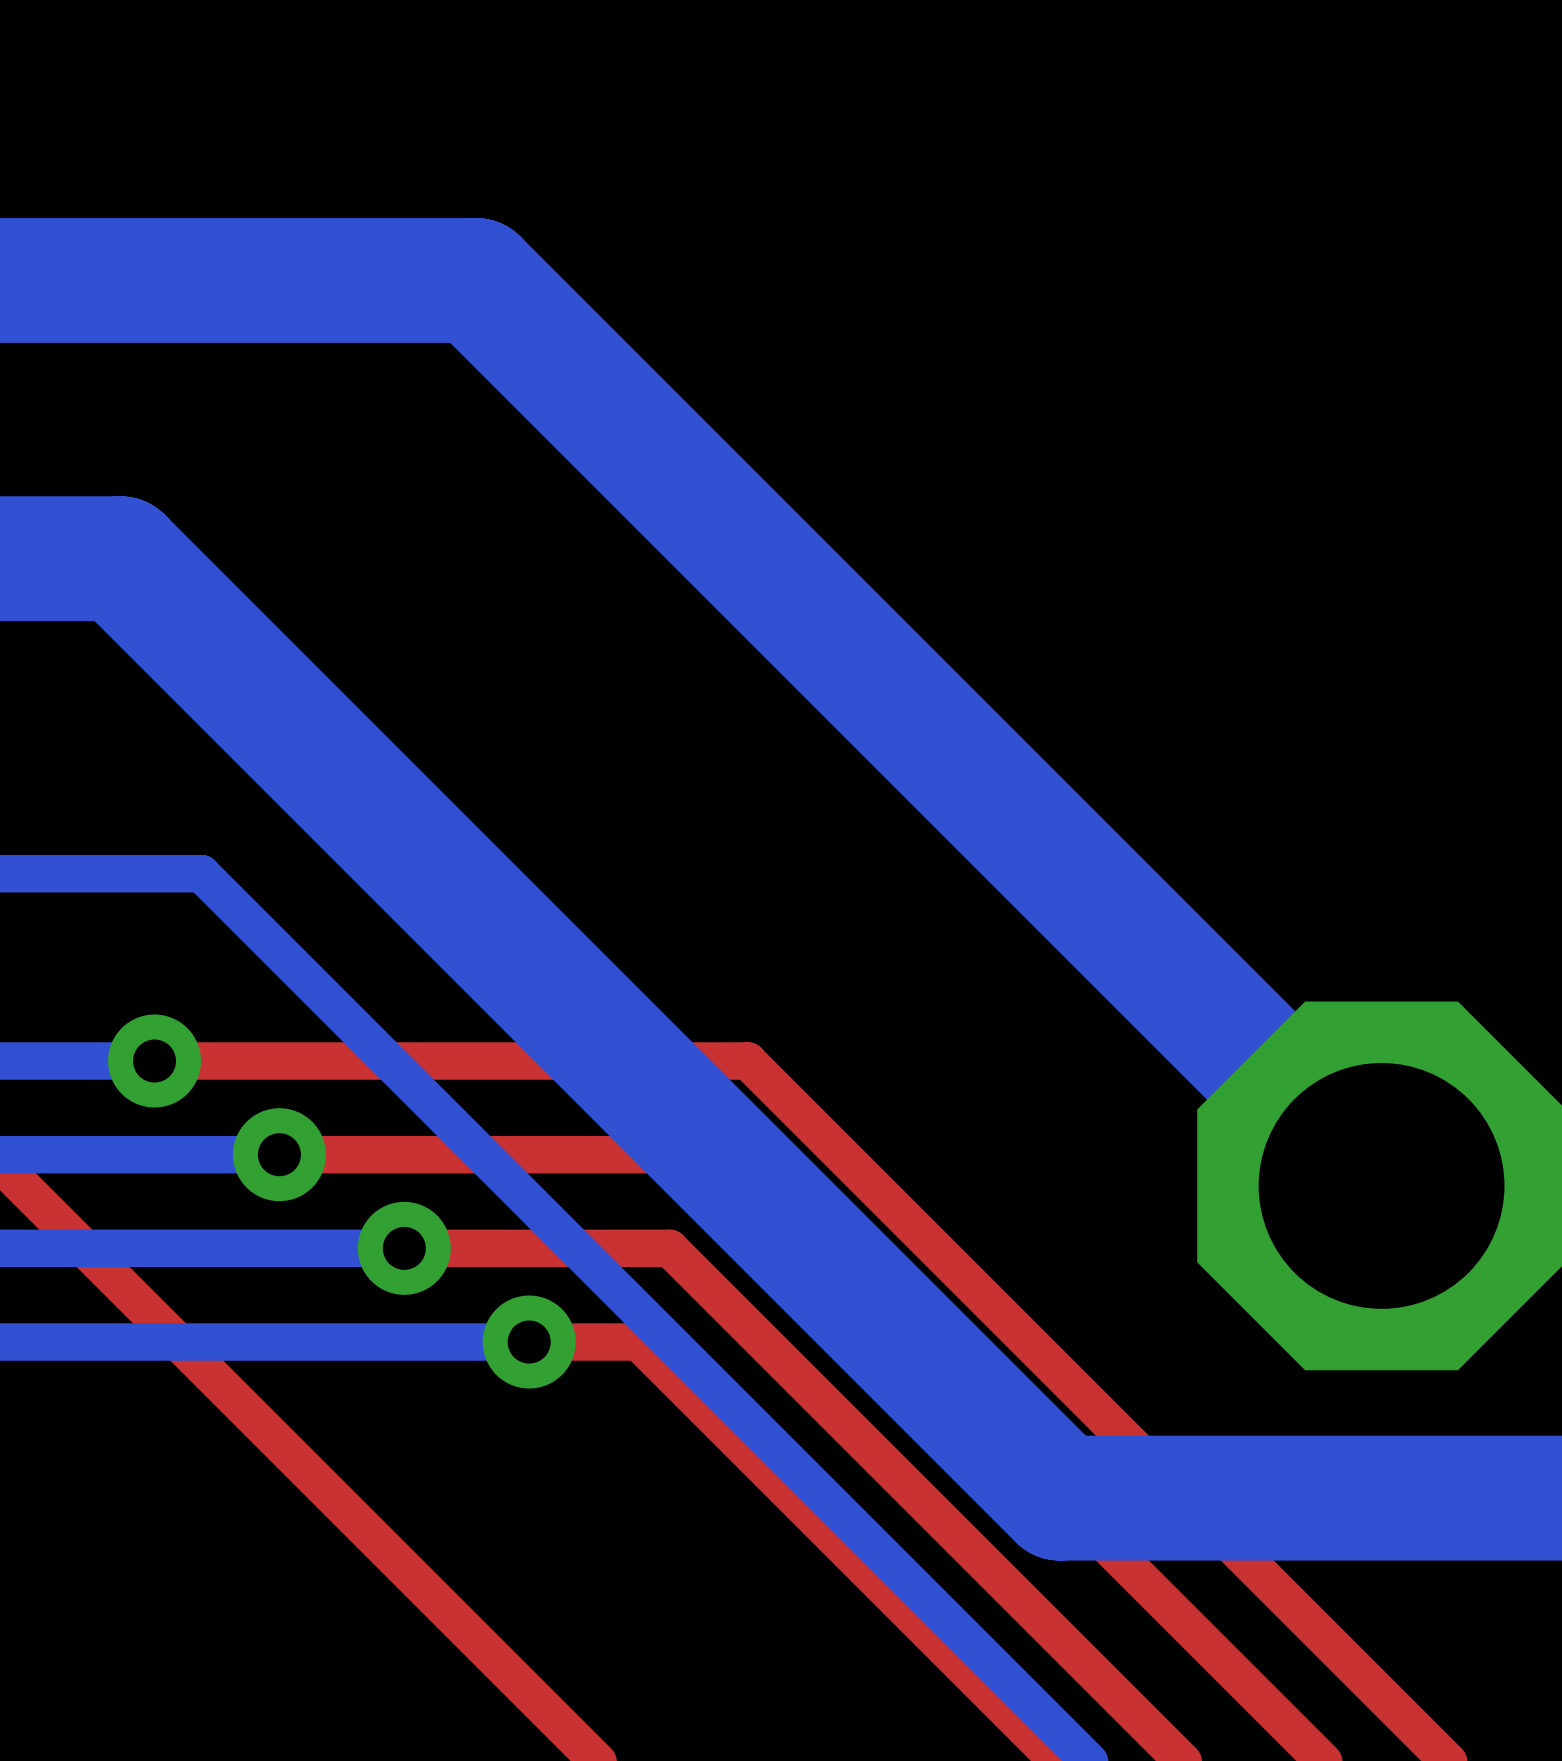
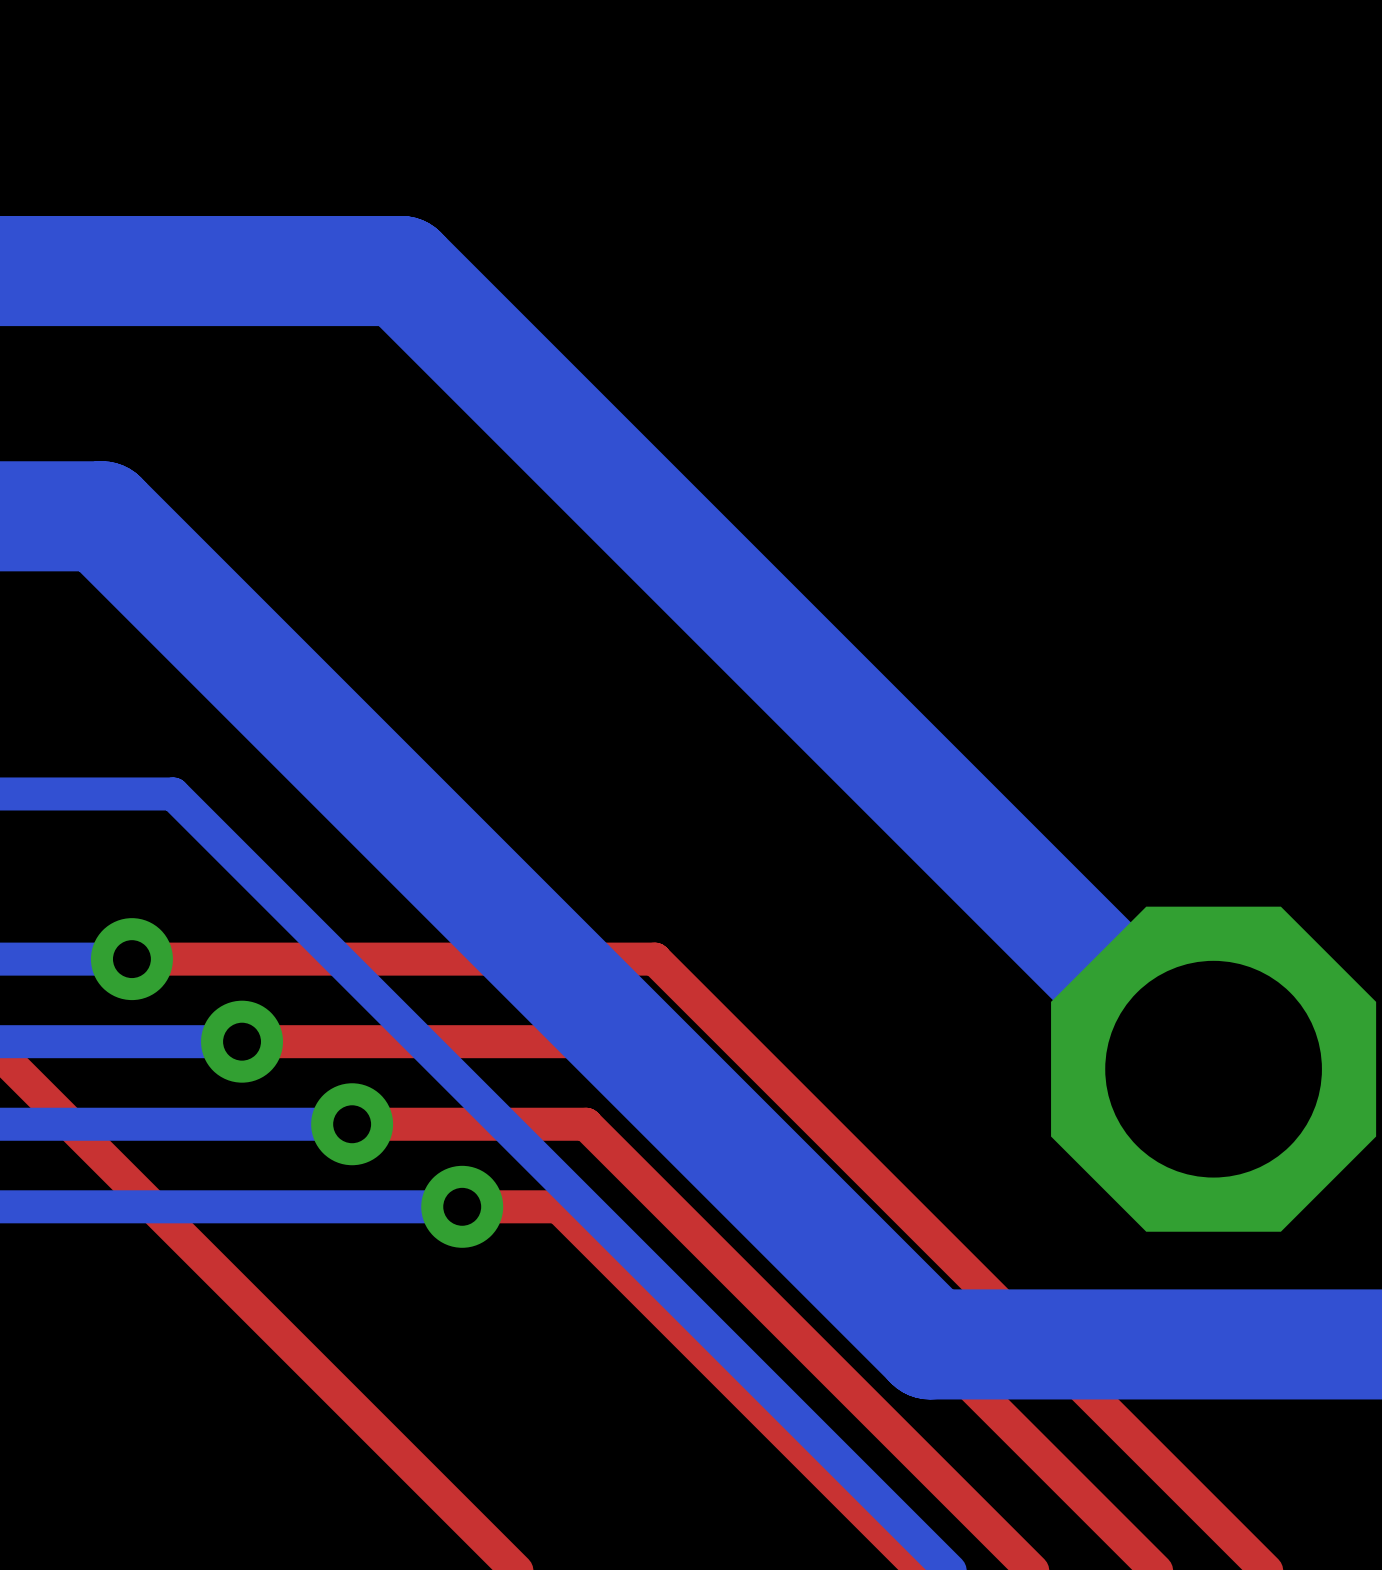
bottom track: (460, 280) (476, 280) (1381, 1185) -> (401, 271) (1199, 1069)

